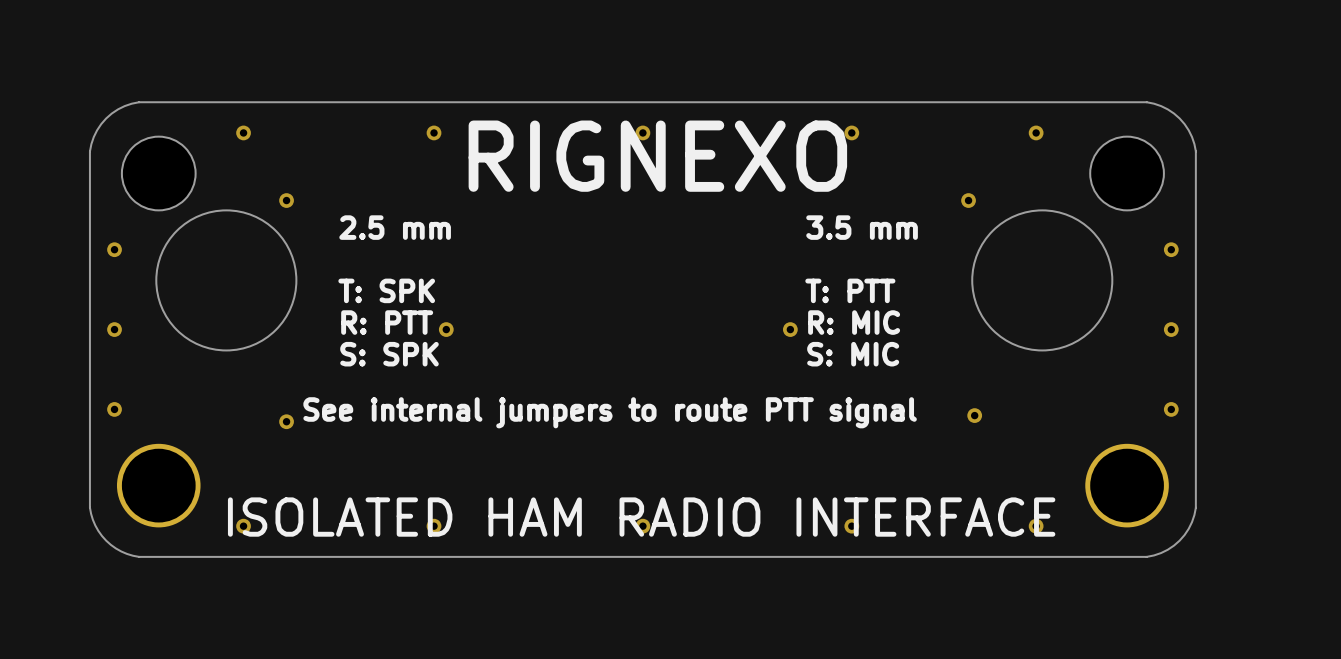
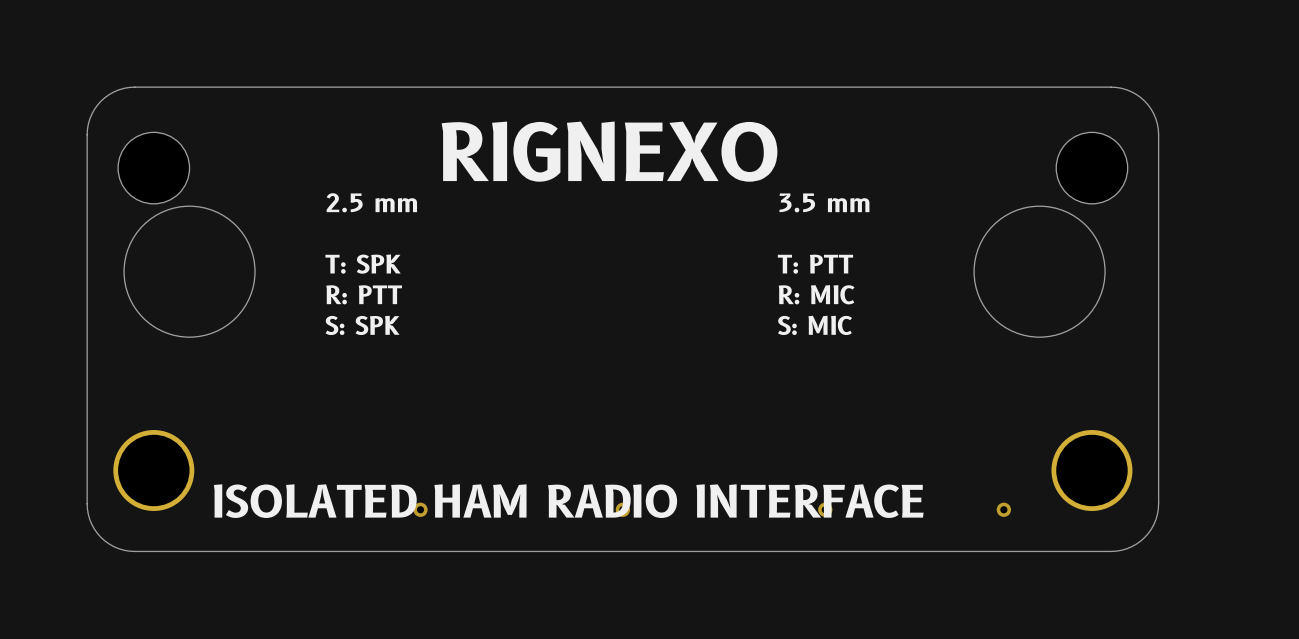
via: (243, 132) -> none
via: (434, 132) -> none
via: (642, 132) -> none
via: (851, 132) -> none
via: (1036, 132) -> none
board edge: (89, 151) (93, 136) (106, 118) (124, 106) (139, 102) (1146, 102) (1161, 106) (1179, 118) (1192, 136) (1195, 151) -> (87, 146) (88, 124) (97, 105) (114, 91) (134, 87) (1116, 87) (1136, 94) (1148, 105) (1157, 124) (1158, 146)
via: (286, 200) -> none
via: (968, 200) -> none
round board edge: [155, 209, 298, 352] -> none
round board edge: [971, 209, 1113, 352] -> none
round board edge: none -> [123, 205, 256, 338]
round board edge: none -> [973, 205, 1106, 338]
text position: 2.5 mm (395, 227) -> 2.5 mm (371, 202)
text position: 3.5 mm (862, 227) -> 3.5 mm (824, 202)
via: (114, 249) -> none
via: (1171, 249) -> none
text position: T: SPK (386, 290) -> T: SPK (363, 264)
text position: T: PTT (850, 290) -> T: PTT (815, 264)
text position: R: PTT (387, 322) -> R: PTT (364, 294)
text position: R: MIC (854, 322) -> R: MIC (816, 294)
via: (114, 329) -> none
via: (446, 329) -> none
via: (790, 329) -> none
via: (1171, 329) -> none
text position: S: SPK (389, 354) -> S: SPK (362, 325)
text position: S: MIC (853, 354) -> S: MIC (815, 325)
via: (114, 409) -> none
via: (1171, 409) -> none
text: See internal jumpers to route PTT signal (610, 412) -> none
via: (974, 415) -> none
via: (286, 421) -> none
board edge: (89, 507) (95, 525) (106, 540) (121, 551) (139, 556) (1146, 556) (1161, 553) (1179, 540) (1192, 522) (1195, 507) -> (87, 491) (88, 514) (97, 533) (114, 546) (134, 551) (1116, 551) (1131, 546) (1148, 533) (1157, 514) (1158, 491)
via: (243, 526) -> none

